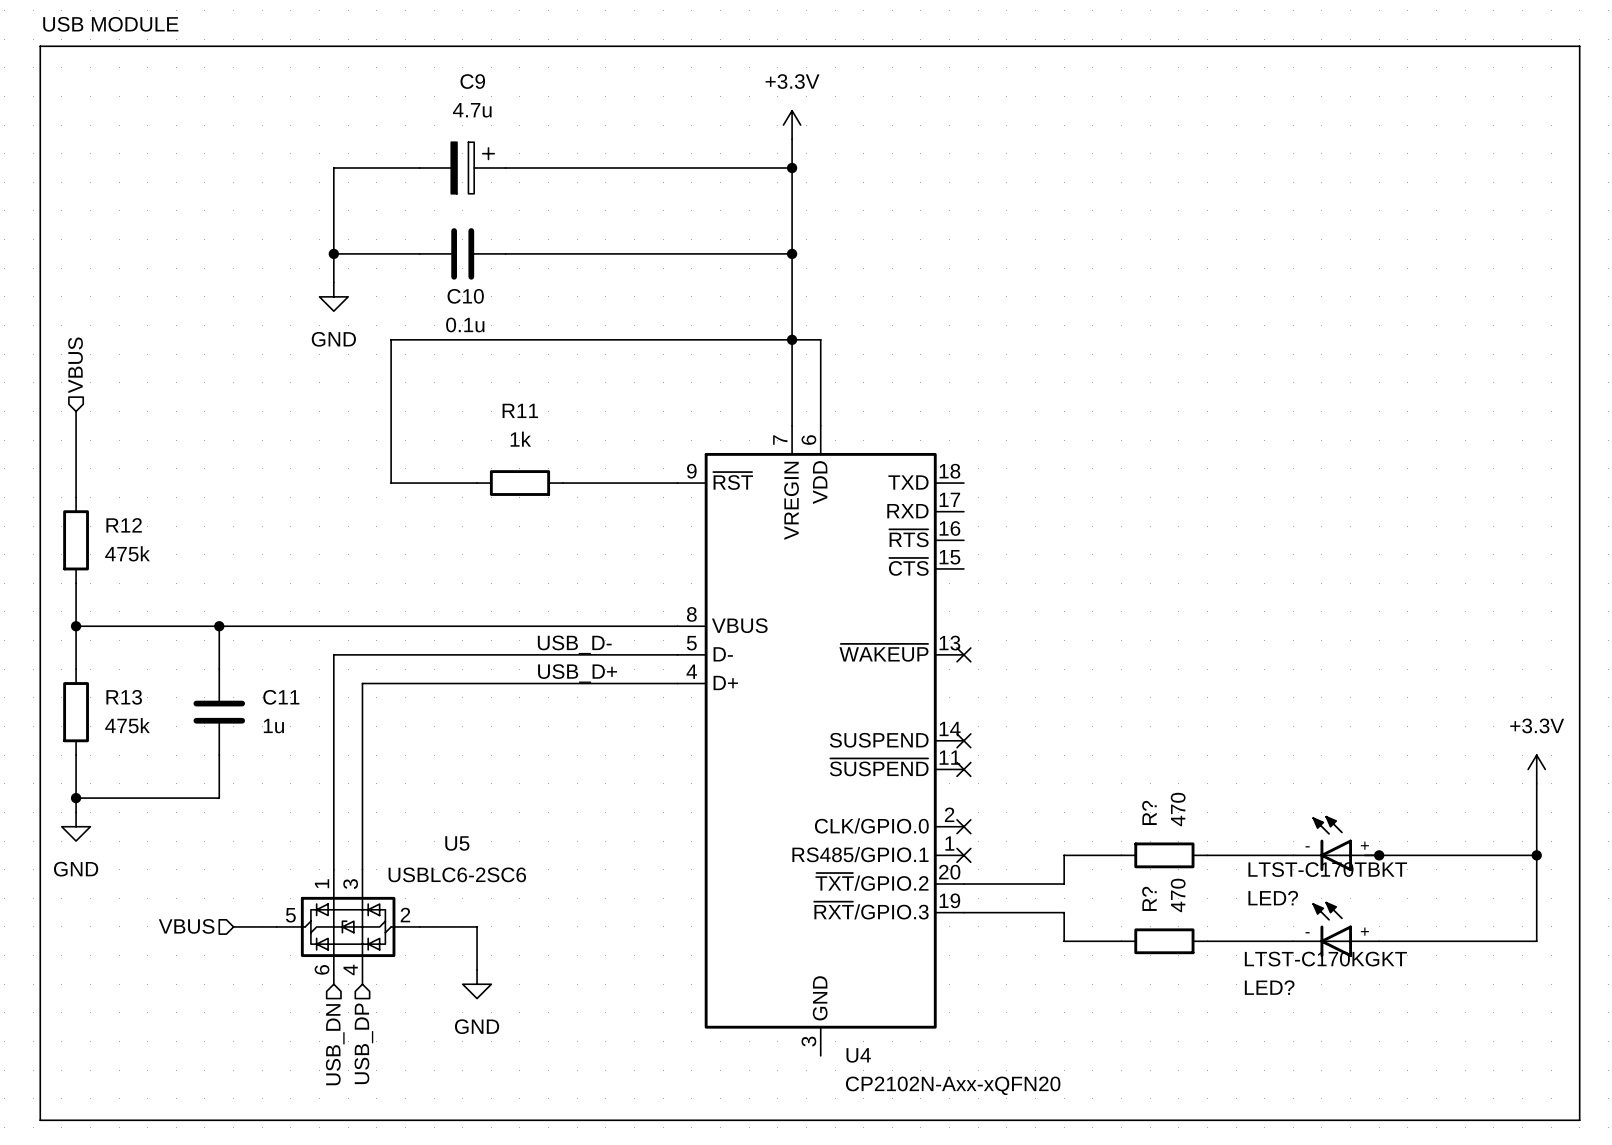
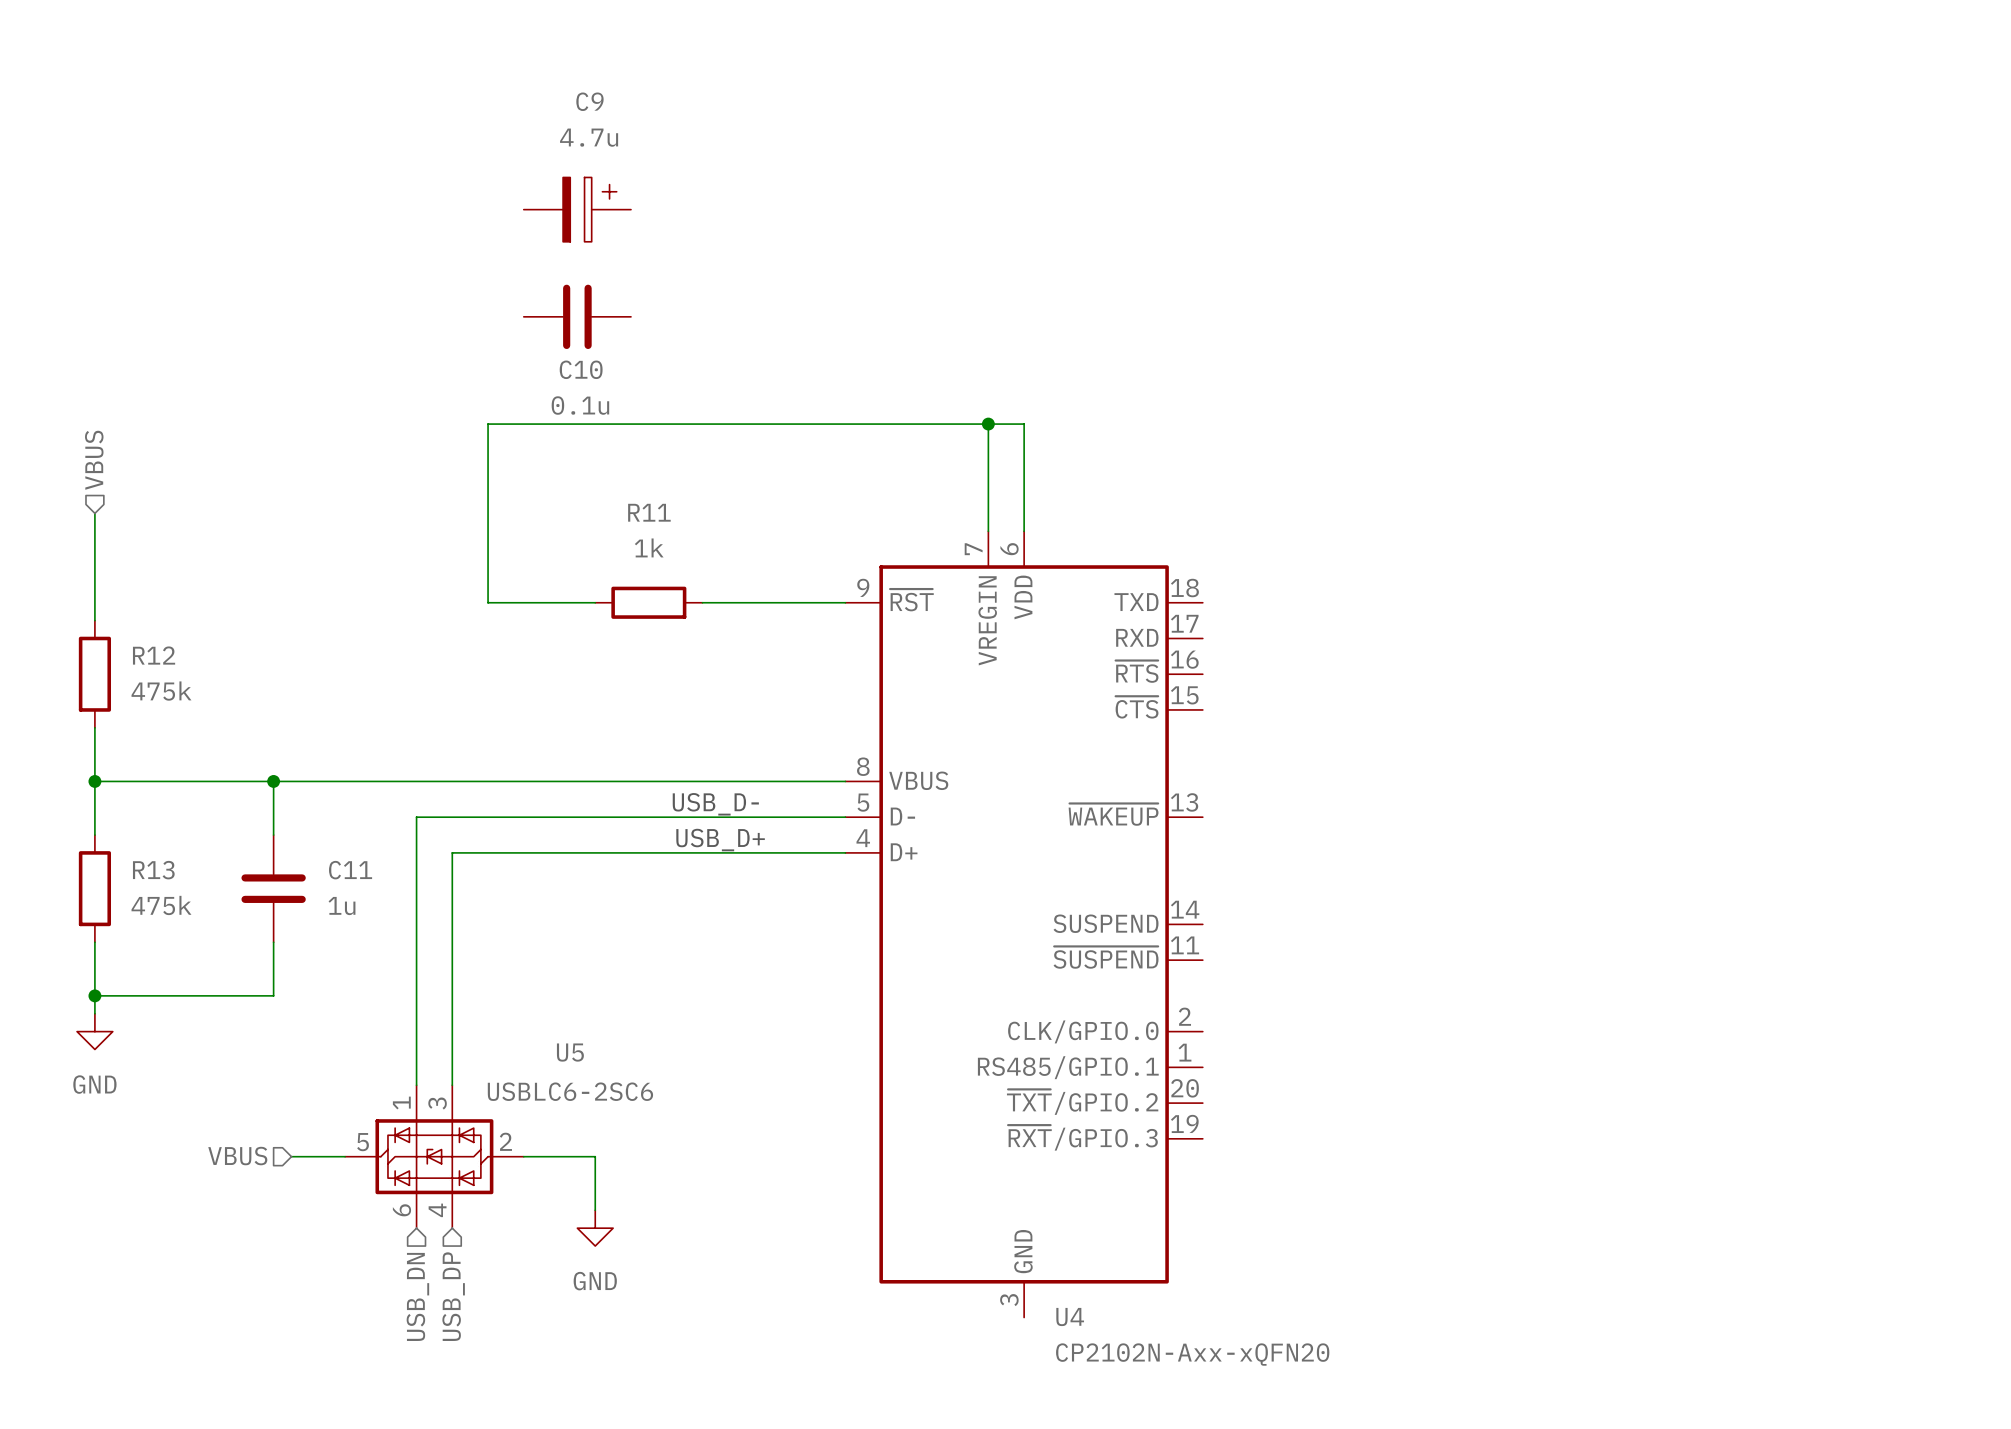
text: USB MODULE (110, 24) -> none
line: (40, 46) (1579, 46) (1579, 1120) (40, 1120) (40, 46) -> none
power symbol: +3.3V (792, 125) -> none
wire: (792, 139) (792, 339) -> none
wire: (419, 168) (333, 168) (333, 282) -> none
wire: (505, 168) (792, 168) -> none
junction: (792, 168) -> none
wire: (333, 253) (419, 253) -> none
junction: (333, 253) -> none
wire: (505, 253) (792, 253) -> none
junction: (792, 253) -> none
power symbol: GND (333, 296) -> none
no-connect mark: (963, 654) -> none
no-connect mark: (963, 740) -> none
no-connect mark: (963, 769) -> none
power symbol: +3.3V (1536, 769) -> none
wire: (1536, 783) (1536, 941) (1379, 941) -> none
no-connect mark: (963, 826) -> none
LED?: LTST-C170TBKT (1336, 843) -> none
no-connect mark: (963, 855) -> none
wire: (1121, 855) (1064, 855) (1064, 884) (963, 884) -> none
R?: 470 (1164, 855) -> none
wire: (1207, 855) (1293, 855) -> none
wire: (1364, 855) (1536, 855) -> none
junction: (1379, 855) -> none
junction: (1536, 855) -> none
wire: (963, 912) (1064, 912) (1064, 941) (1121, 941) -> none
LED?: LTST-C170KGKT (1336, 929) -> none
R?: 470 (1164, 941) -> none
wire: (1207, 941) (1293, 941) -> none

